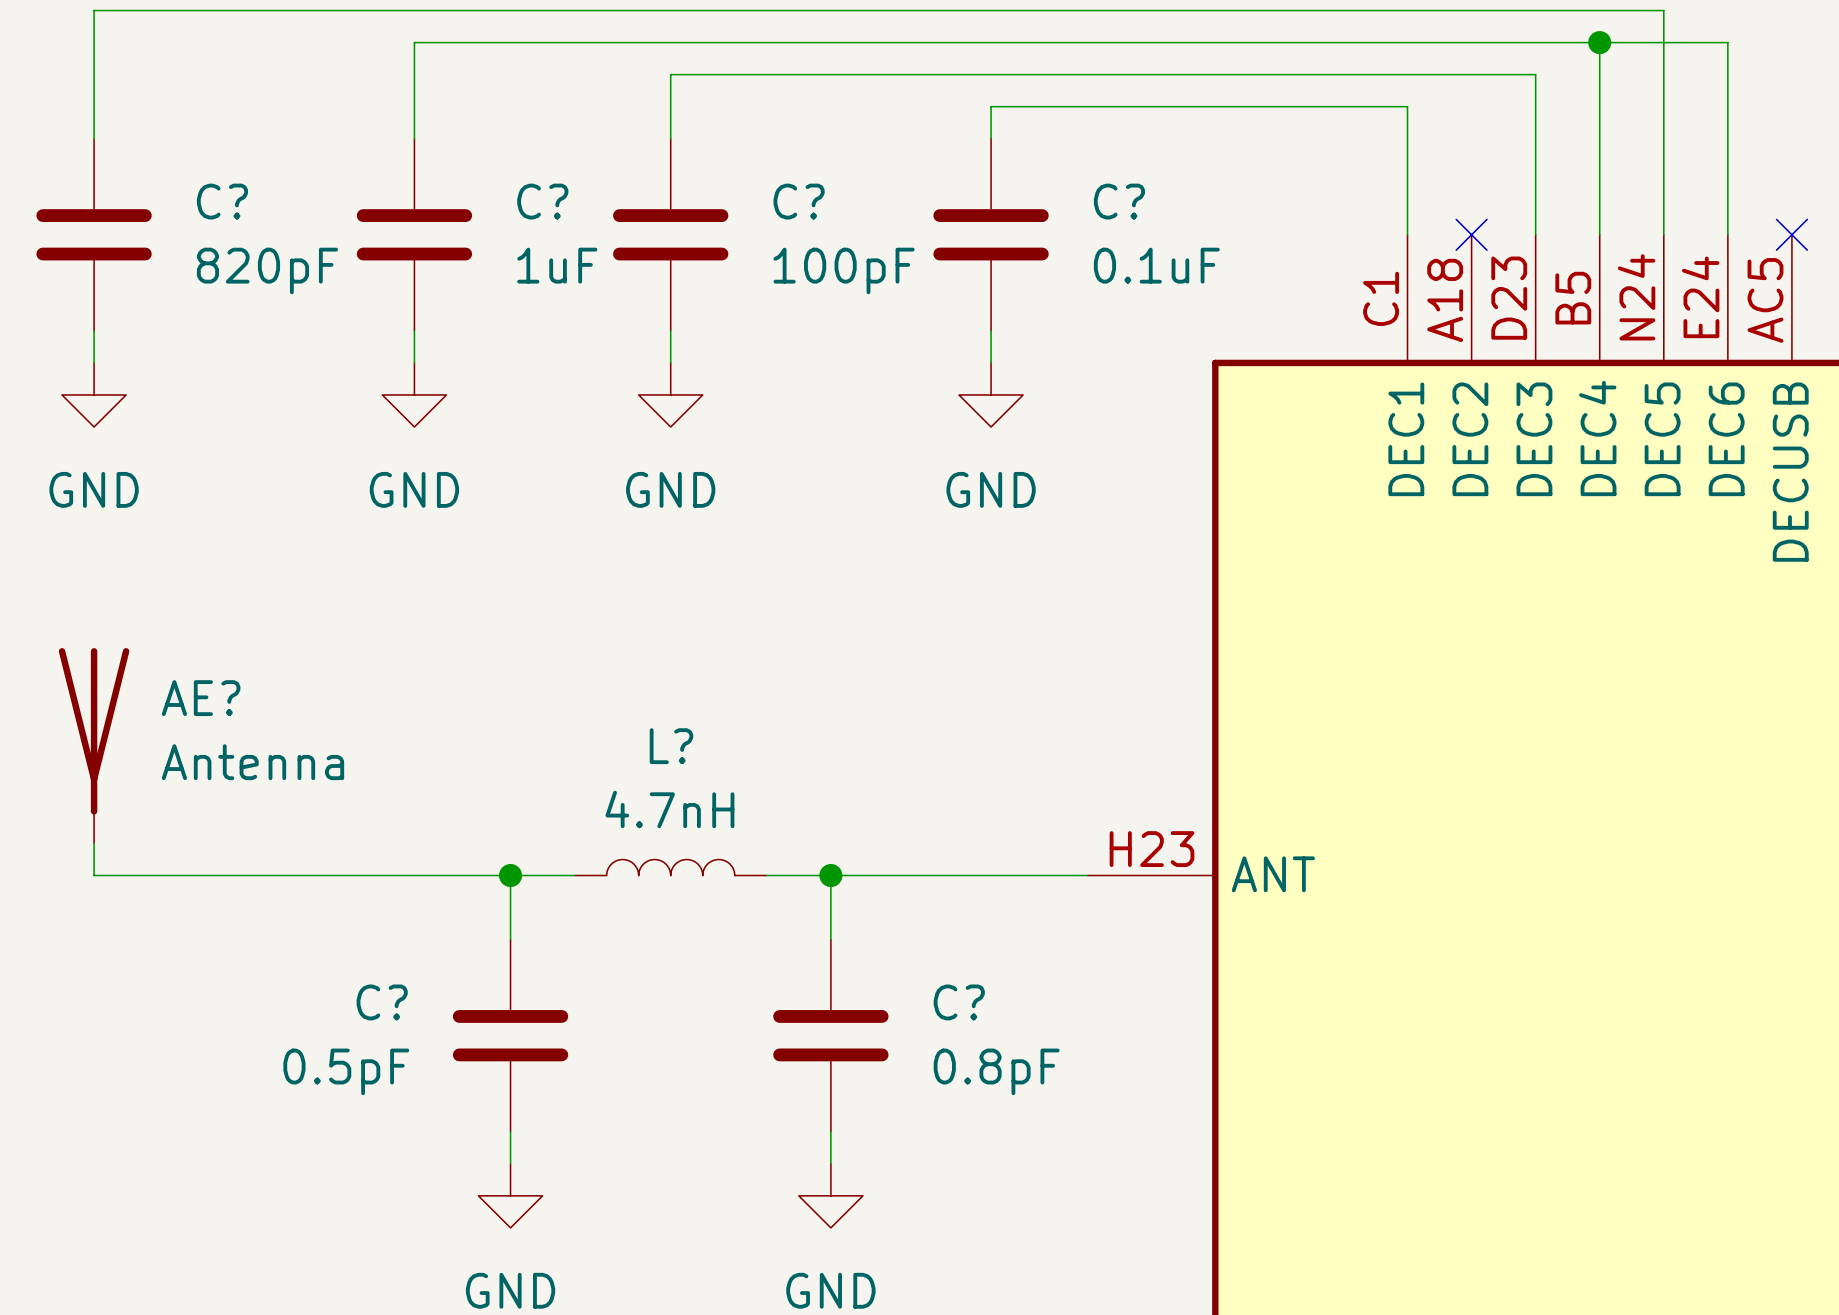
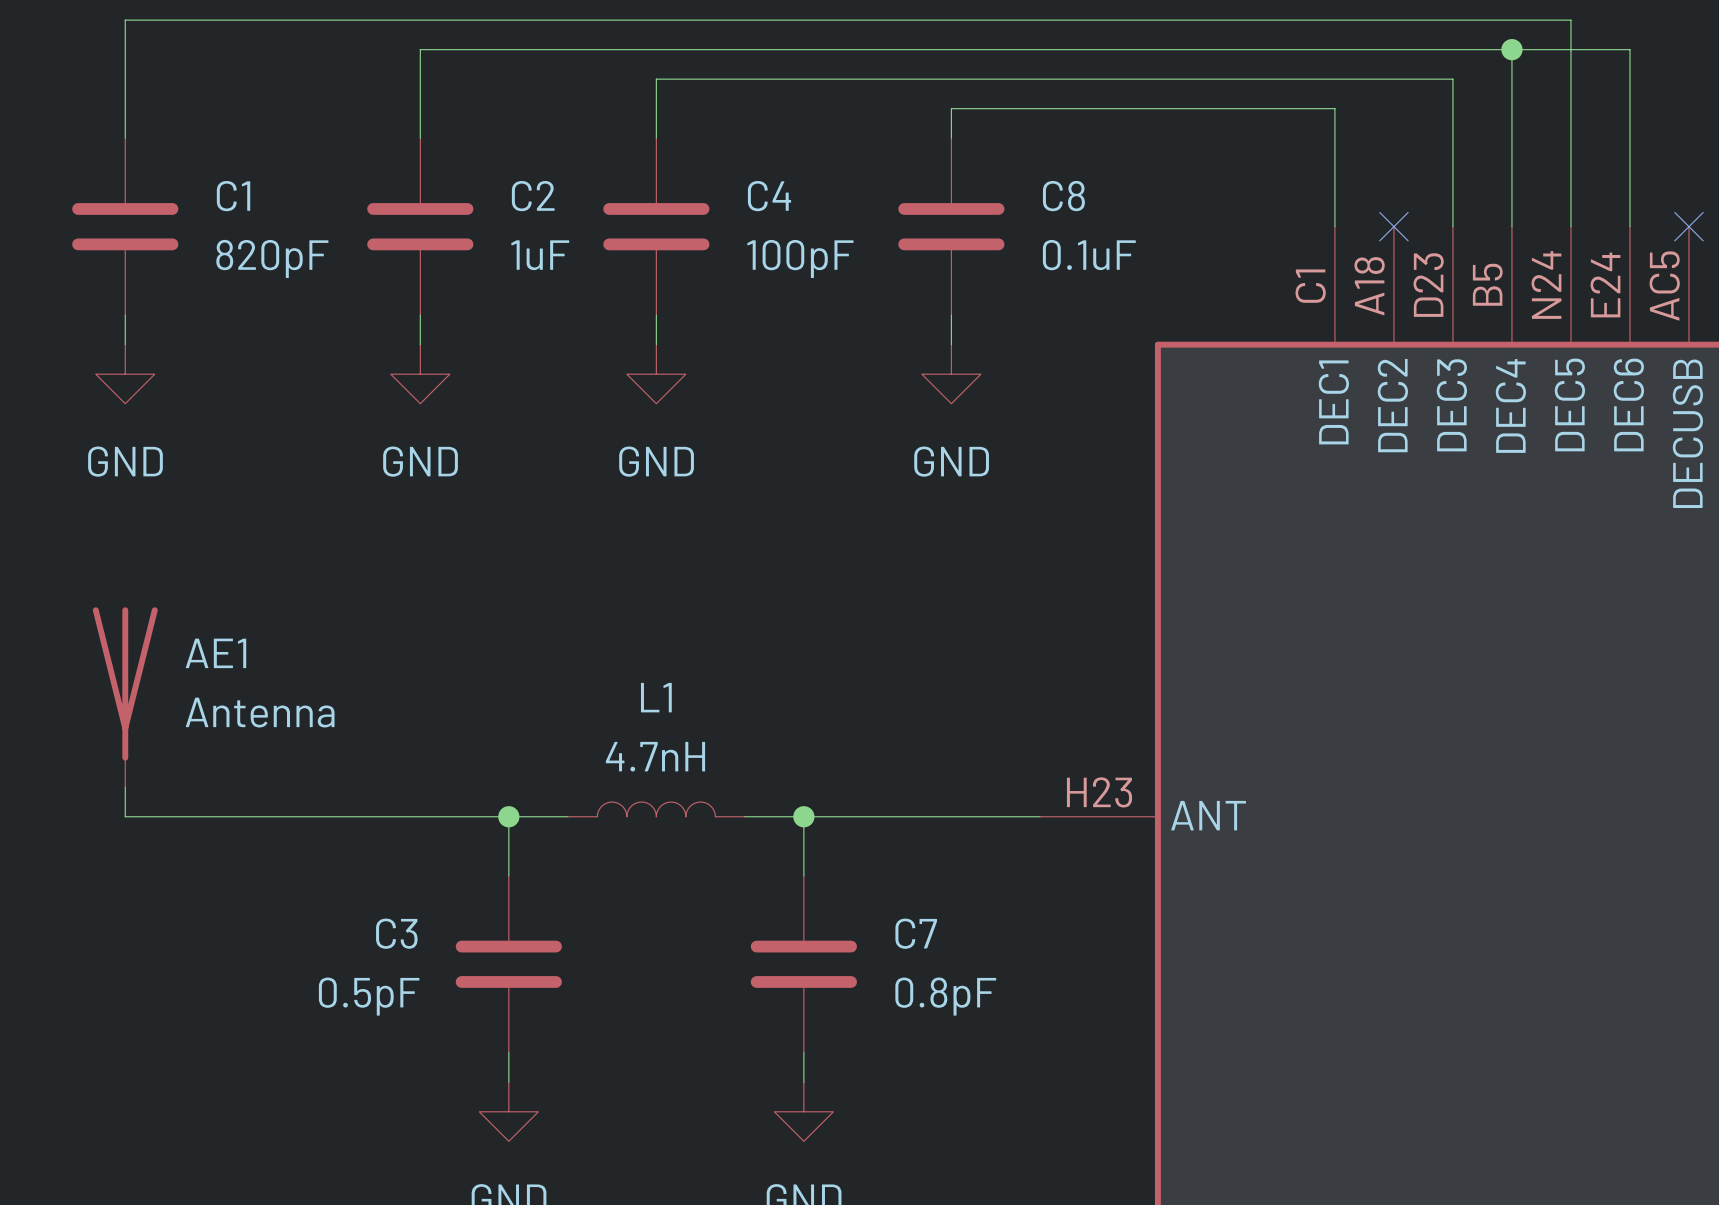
C? name: C? (222, 201) -> C1 (233, 196)
C? name: C? (542, 201) -> C2 (533, 196)
C? name: C? (799, 201) -> C4 (769, 196)
C? name: C? (1119, 201) -> C8 (1063, 196)
AE? name: AE? (201, 698) -> AE1 (215, 653)
L? name: L? (671, 746) -> L1 (656, 697)
C? name: C? (382, 1002) -> C3 (396, 933)
C? name: C? (959, 1002) -> C7 (916, 933)

